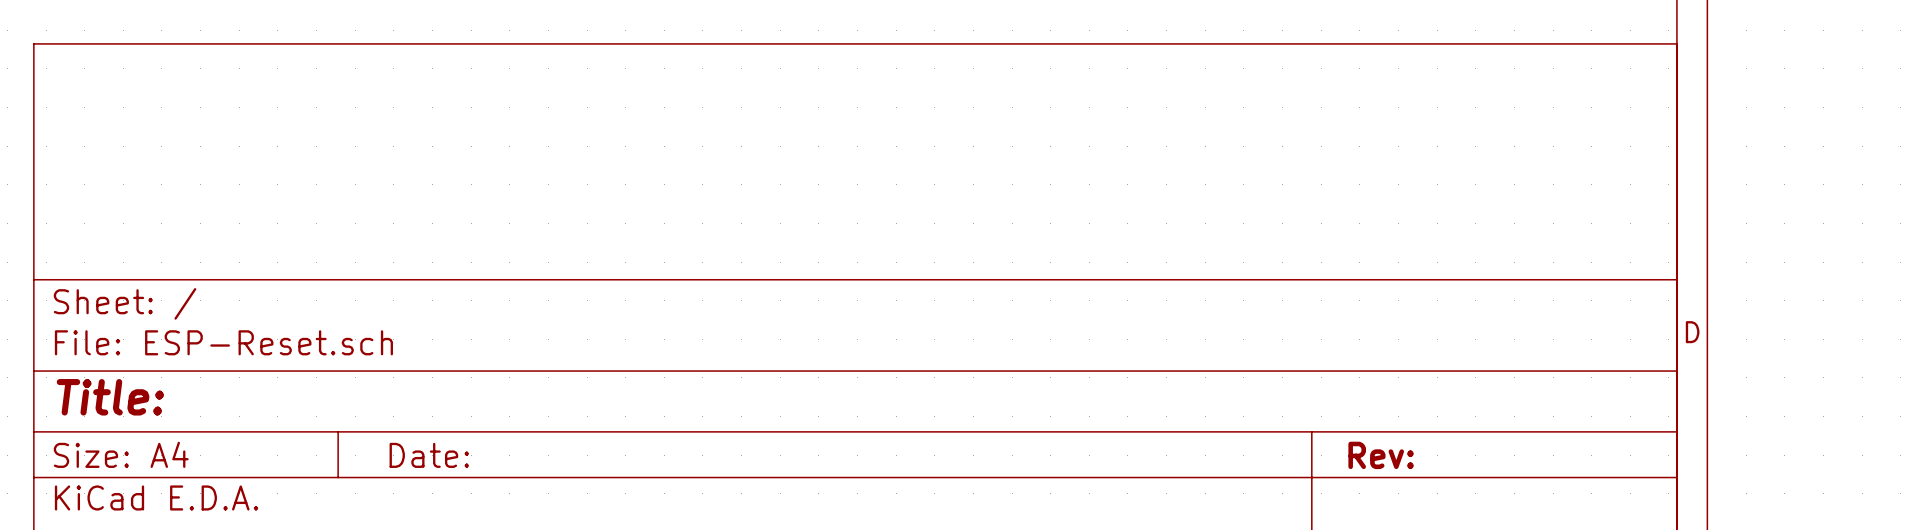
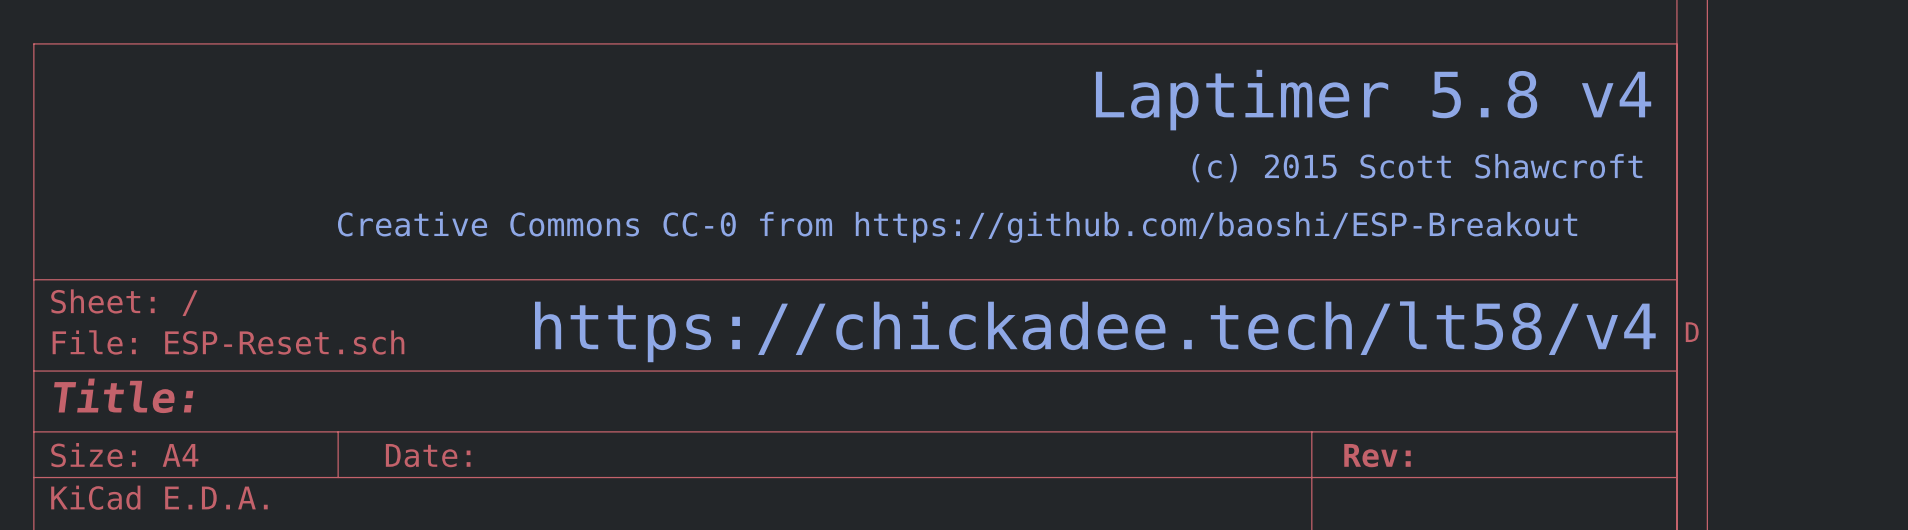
text: none -> Laptimer 5.8 v4 (1373, 100)
text: none -> (c) 2015 Scott Shawcroft (1417, 168)
text: none -> Creative Commons CC-0 from https://github.com/baoshi/ESP-Breakout (957, 227)
text: none -> https://chickadee.tech/lt58/v4 (1095, 331)

